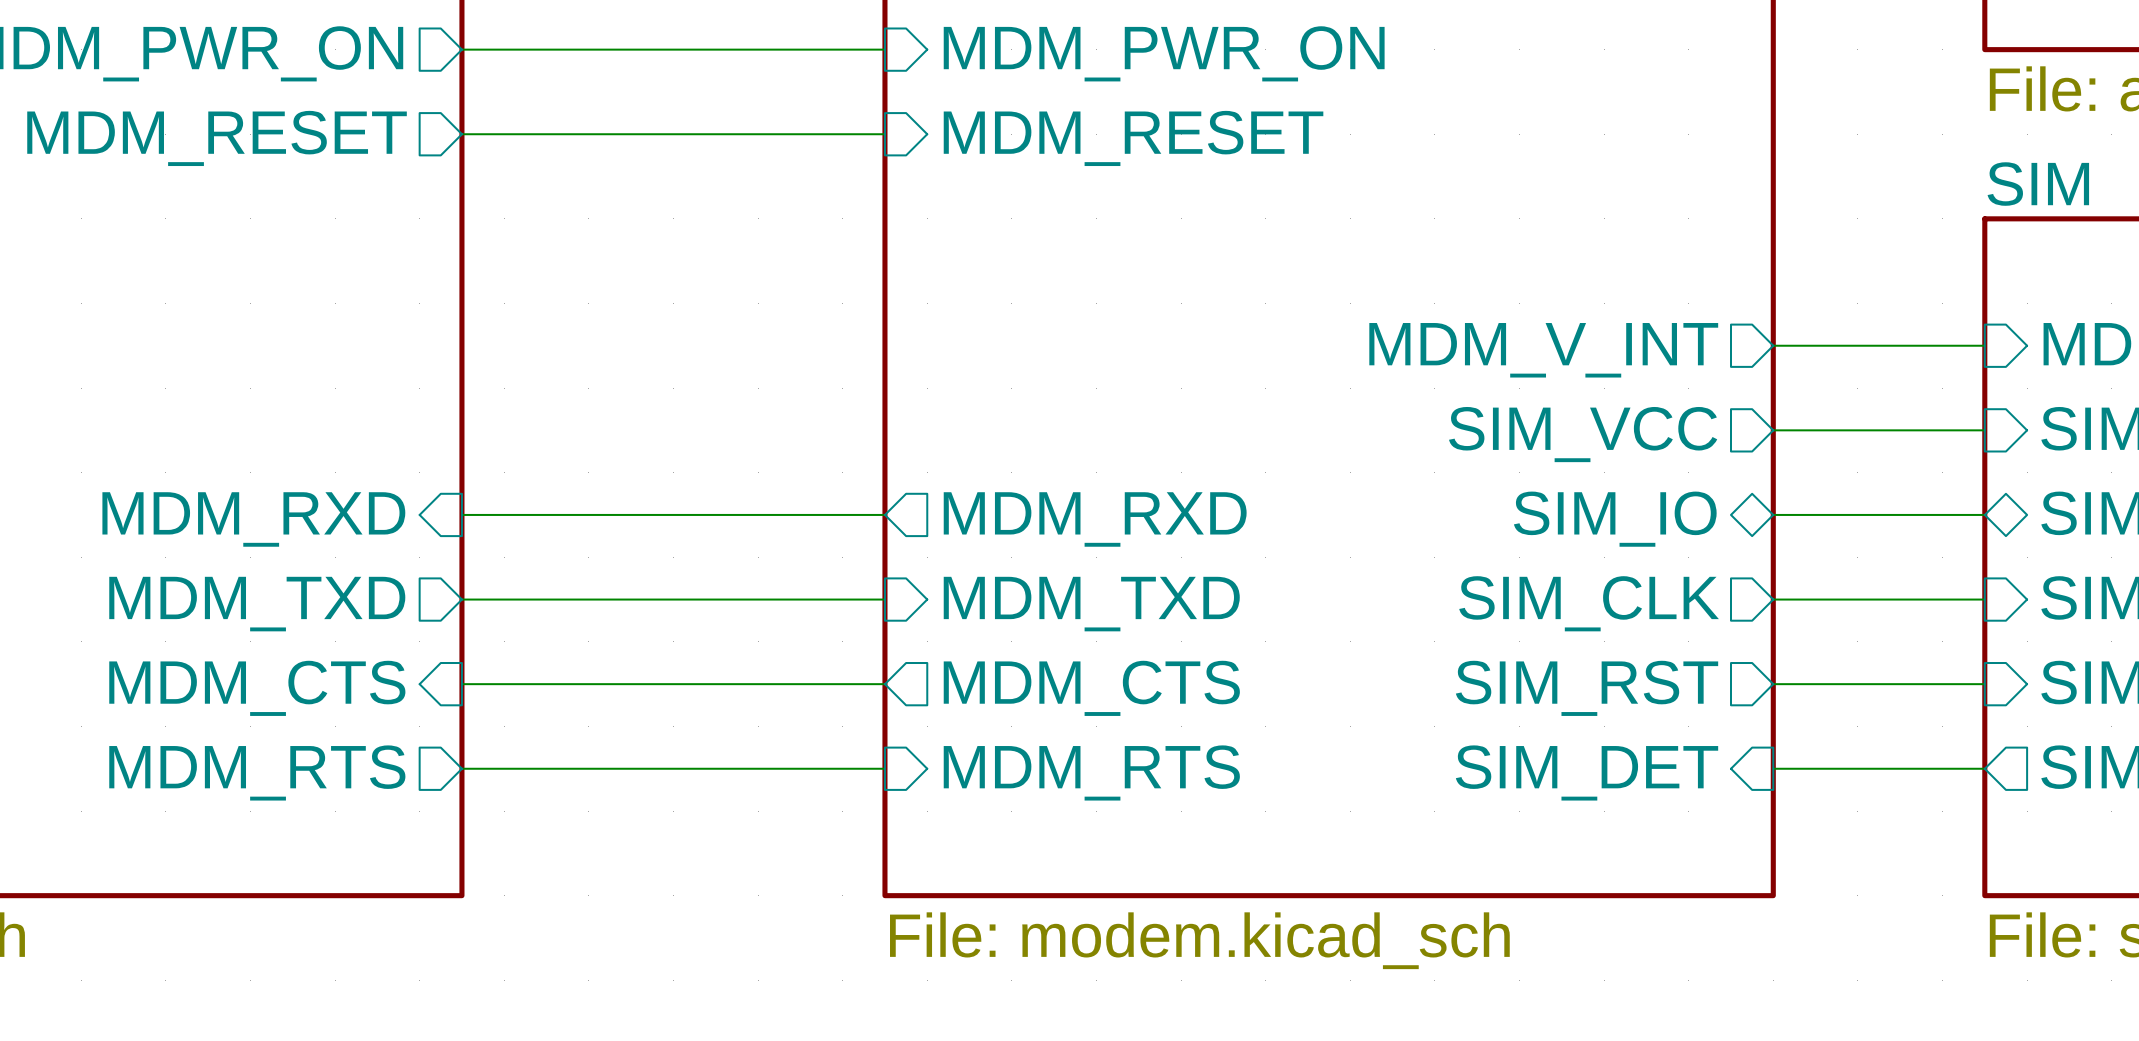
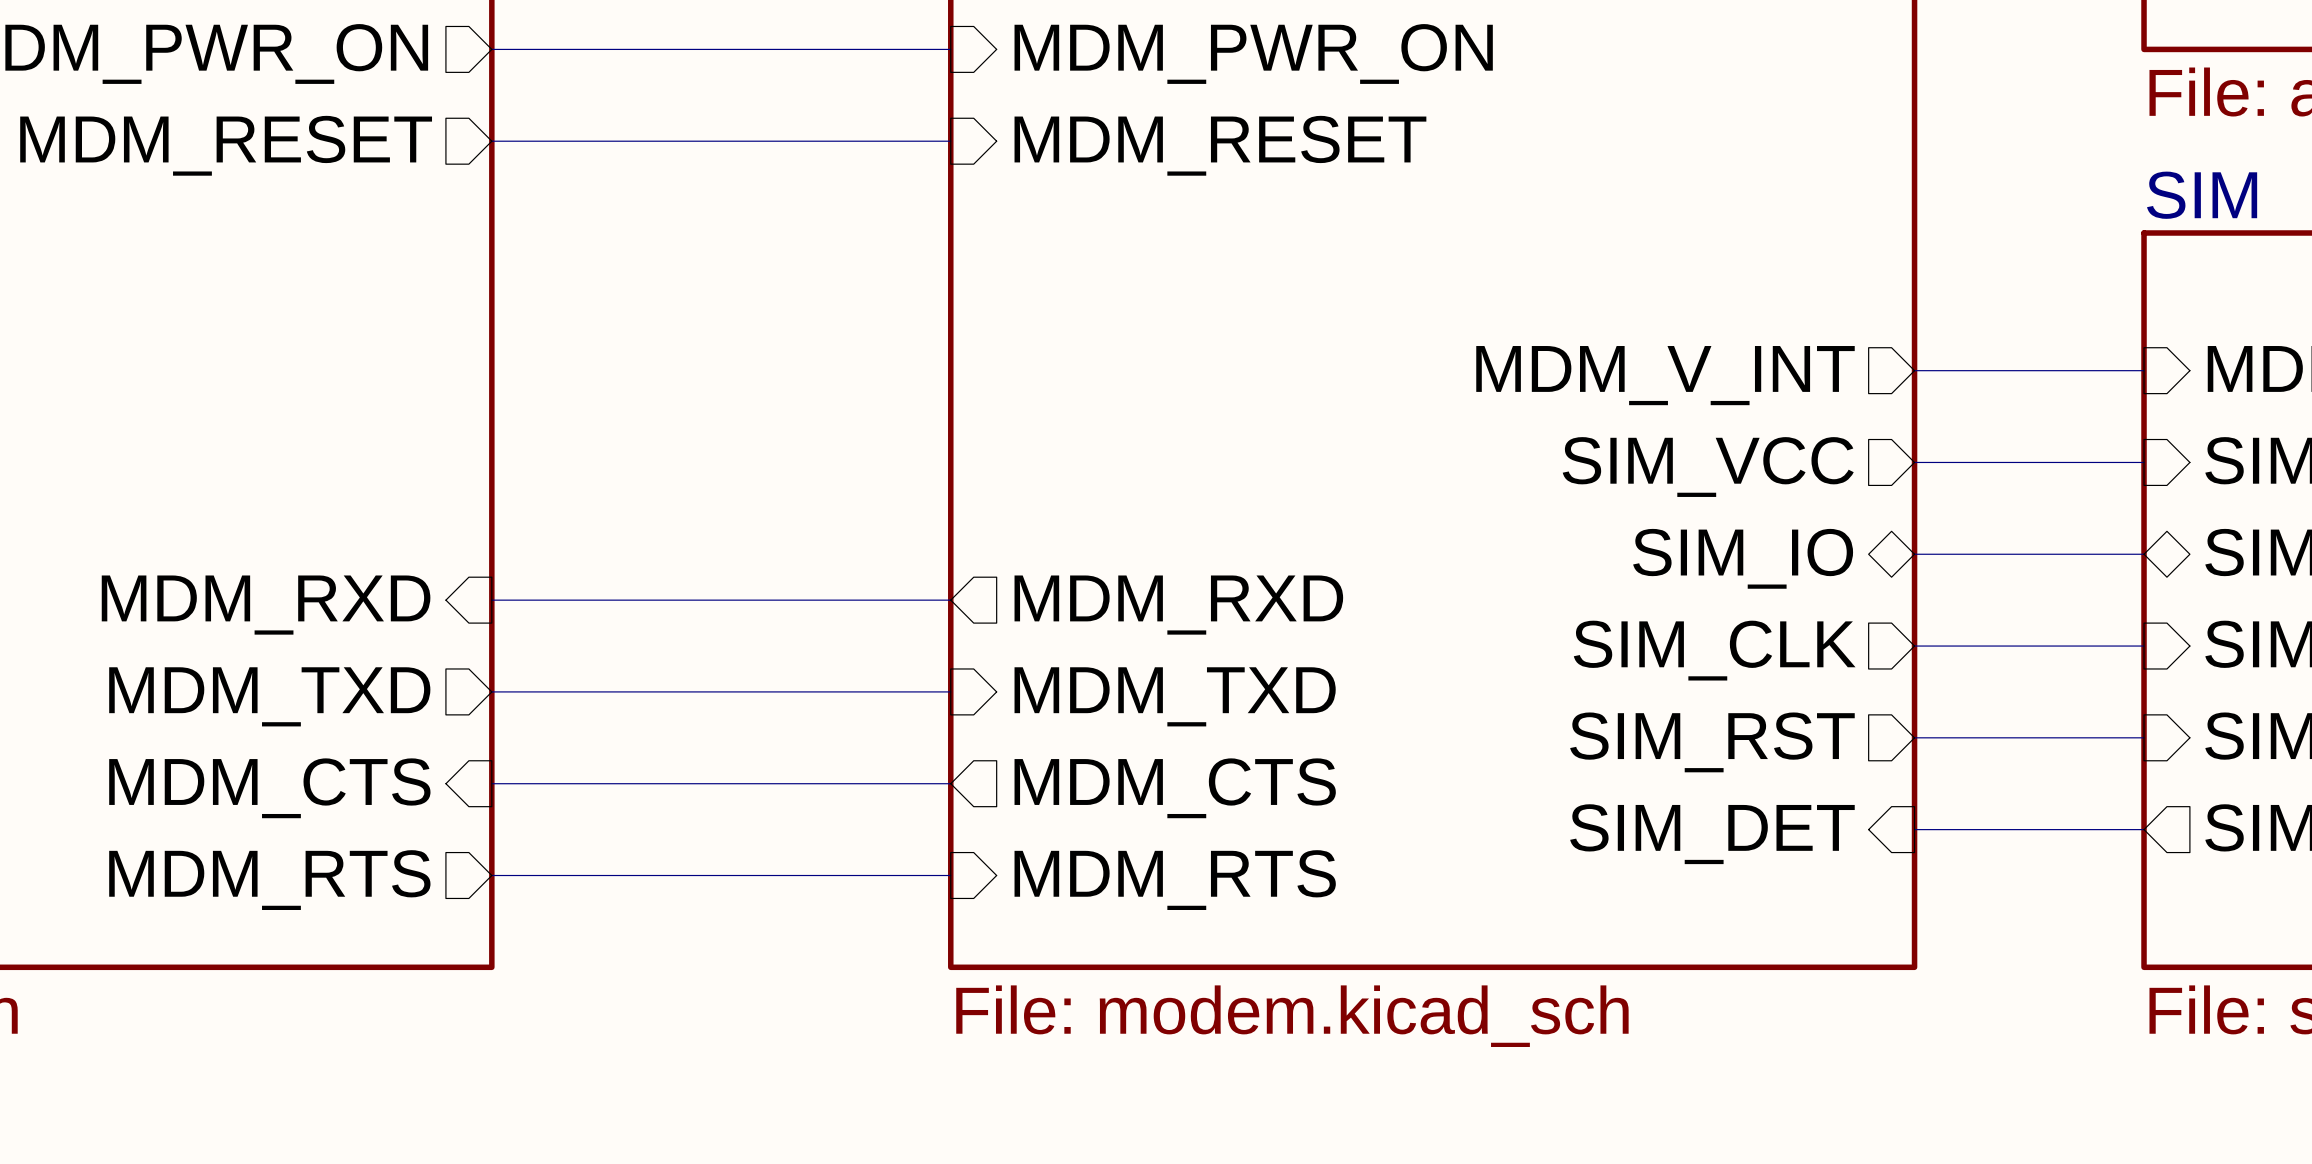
wire: (461, 514) (884, 514) -> (491, 600) (950, 600)
sheet pin position: MDM_RXD (253, 519) -> MDM_RXD (266, 605)
sheet pin position: MDM_RXD (1095, 519) -> MDM_RXD (1178, 605)
wire: (461, 599) (884, 599) -> (491, 691) (950, 691)
sheet pin position: MDM_TXD (257, 604) -> MDM_TXD (269, 696)
sheet pin position: MDM_TXD (1091, 604) -> MDM_TXD (1175, 696)
wire: (461, 684) (884, 684) -> (491, 783) (950, 783)
sheet pin position: MDM_CTS (257, 688) -> MDM_CTS (269, 788)
sheet pin position: MDM_CTS (1091, 688) -> MDM_CTS (1175, 788)
wire: (461, 768) (884, 768) -> (491, 875) (950, 875)
sheet pin position: MDM_RTS (257, 772) -> MDM_RTS (269, 880)
sheet pin position: MDM_RTS (1091, 772) -> MDM_RTS (1175, 880)

